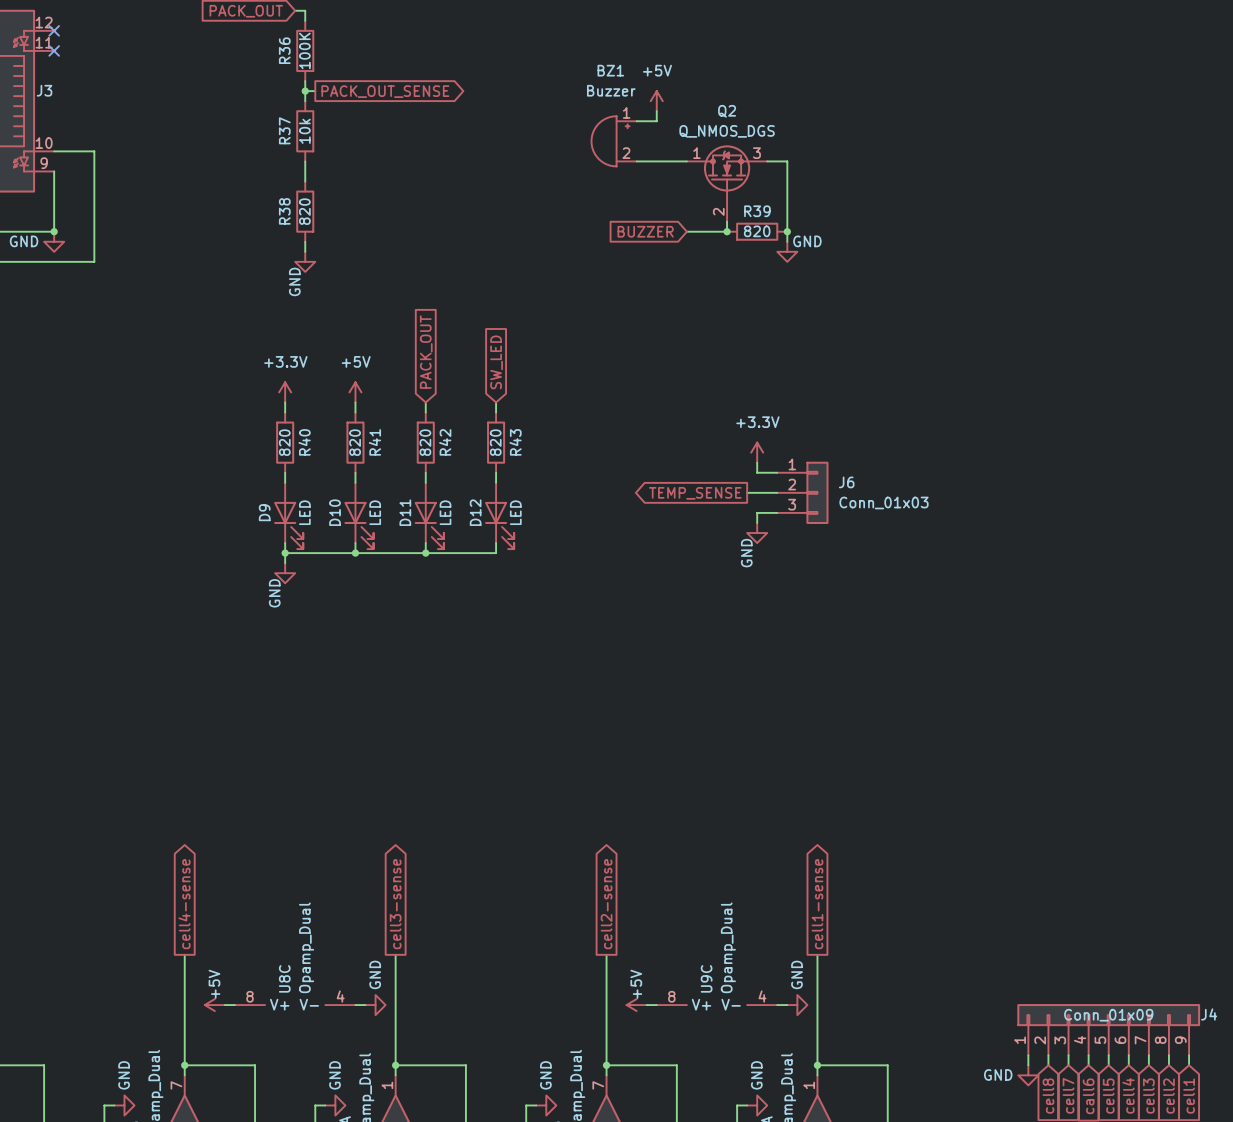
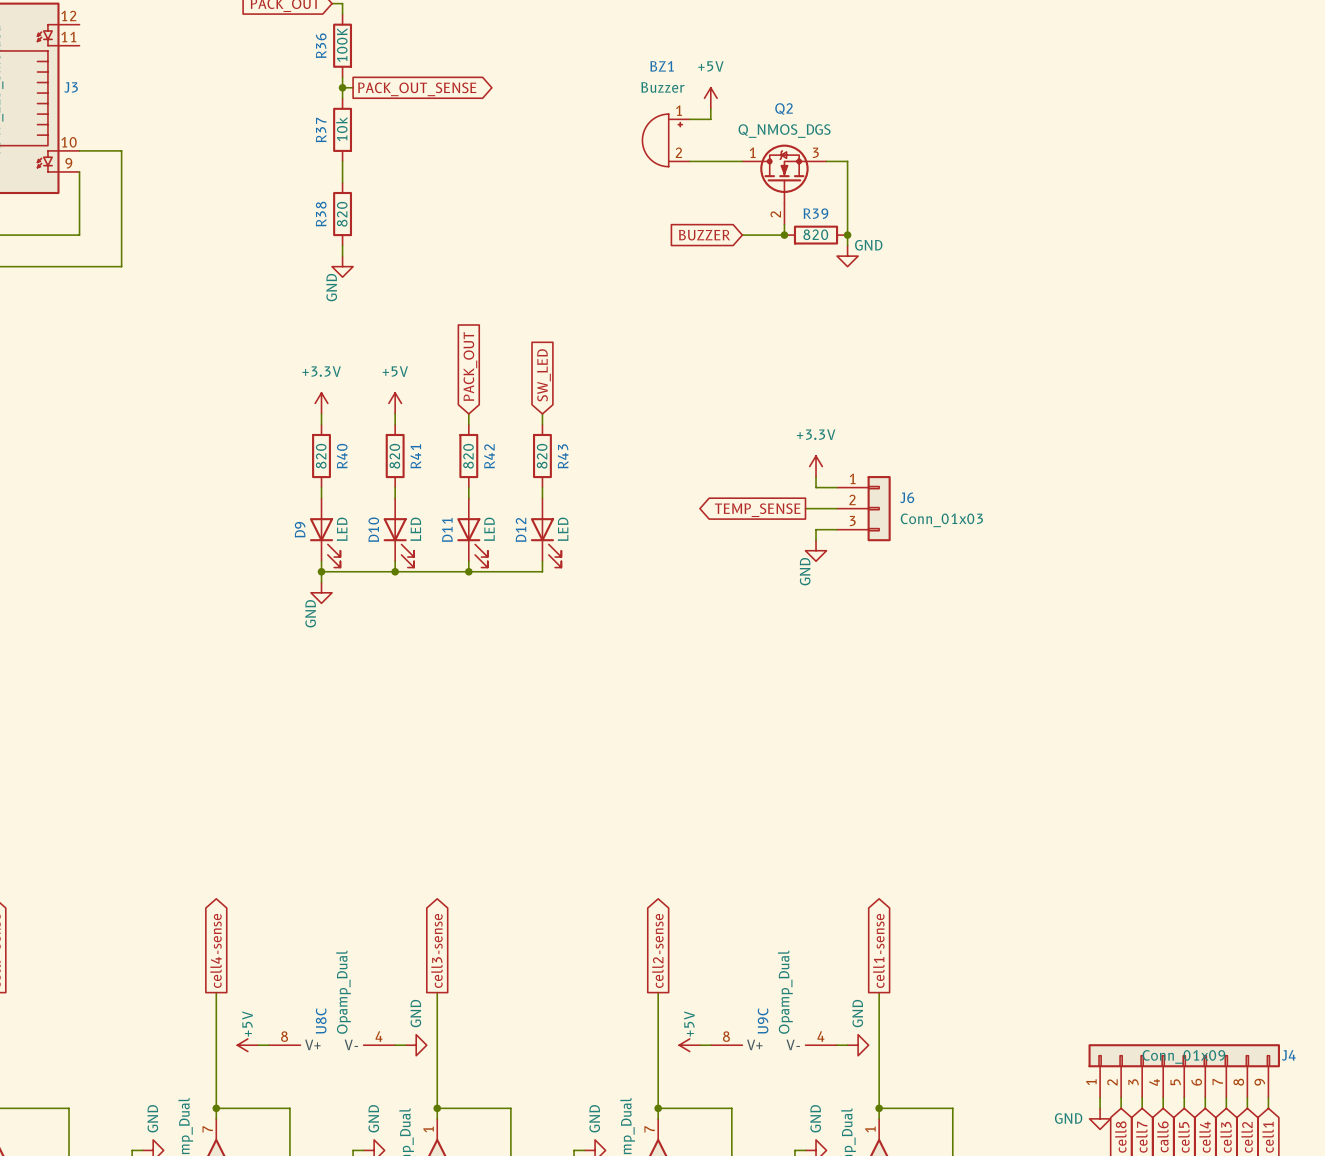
no-connect mark: (54, 30) -> none
no-connect mark: (54, 50) -> none
junction: (54, 231) -> none
power symbol: GND (54, 241) -> none

